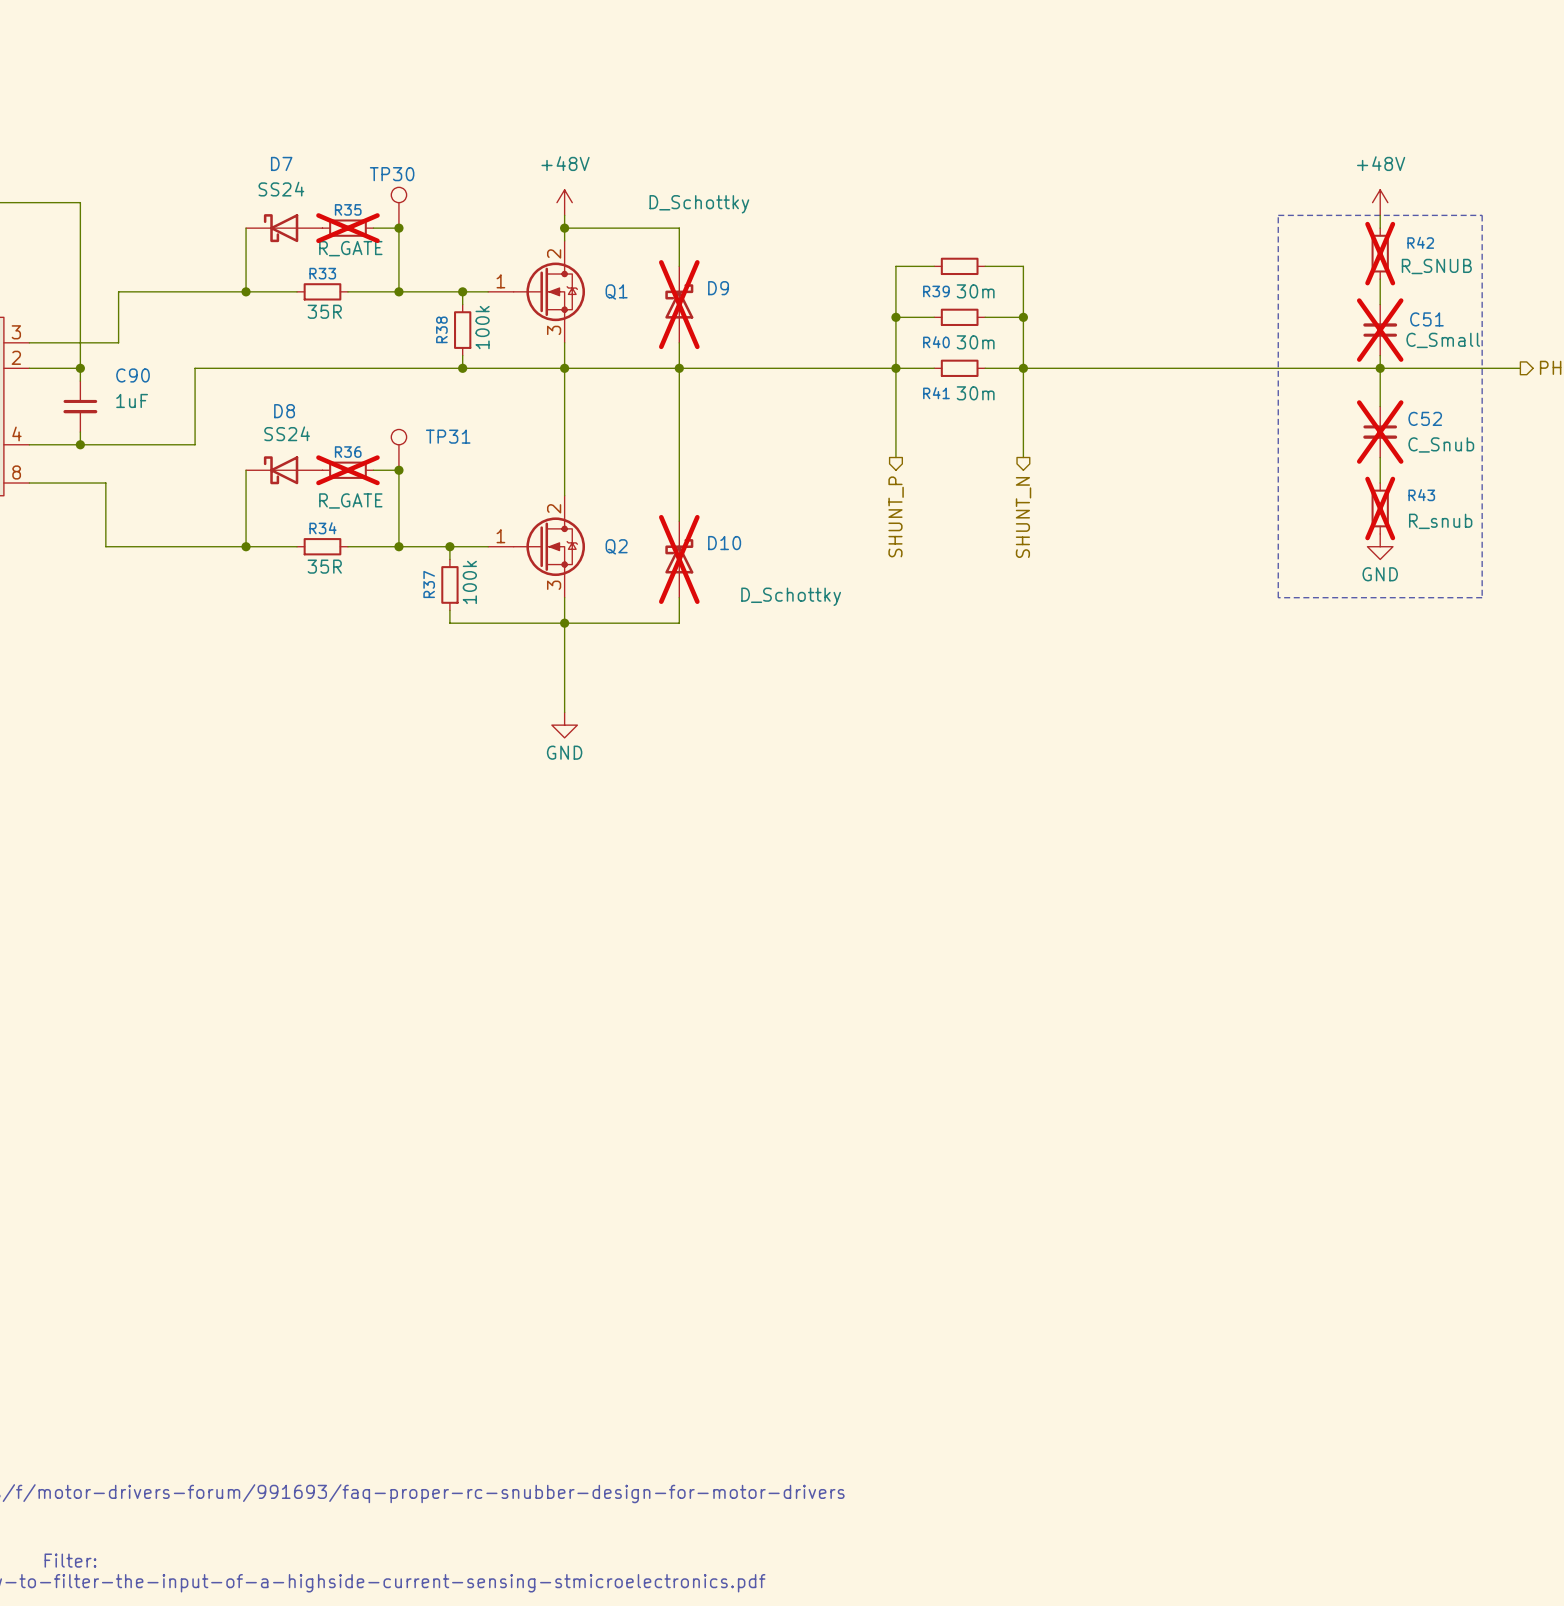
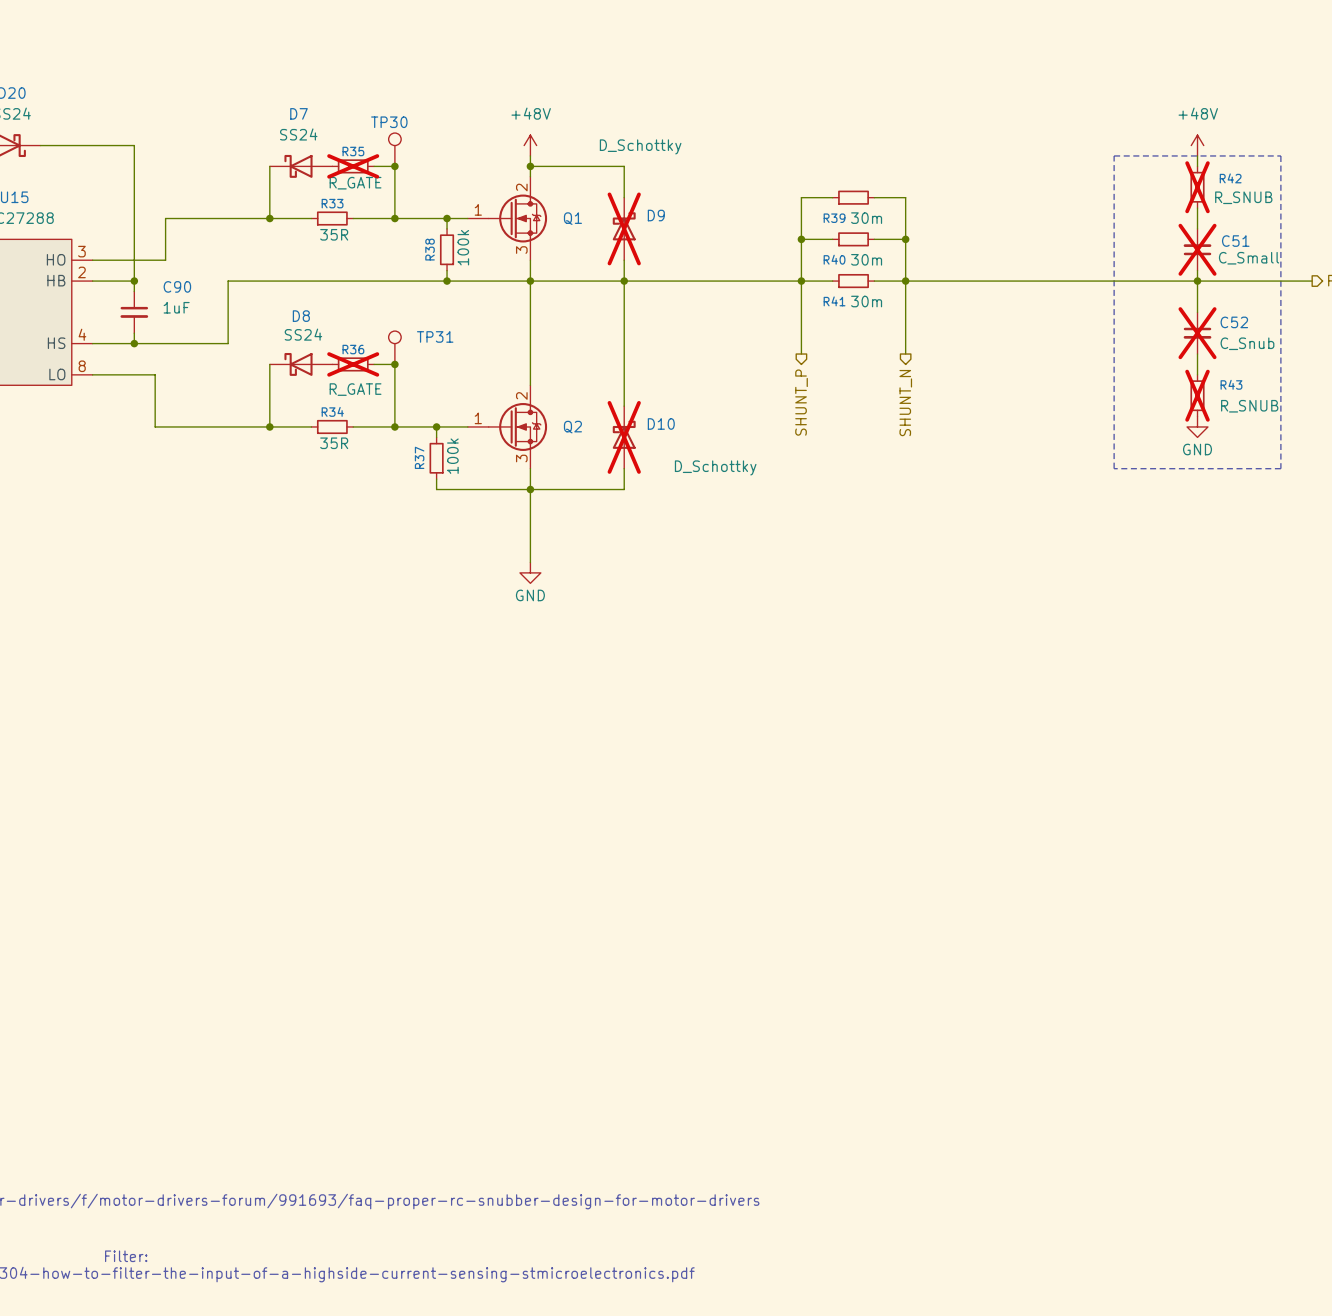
R43 value: R_snub (1440, 521) -> R_SNUB (1249, 406)

